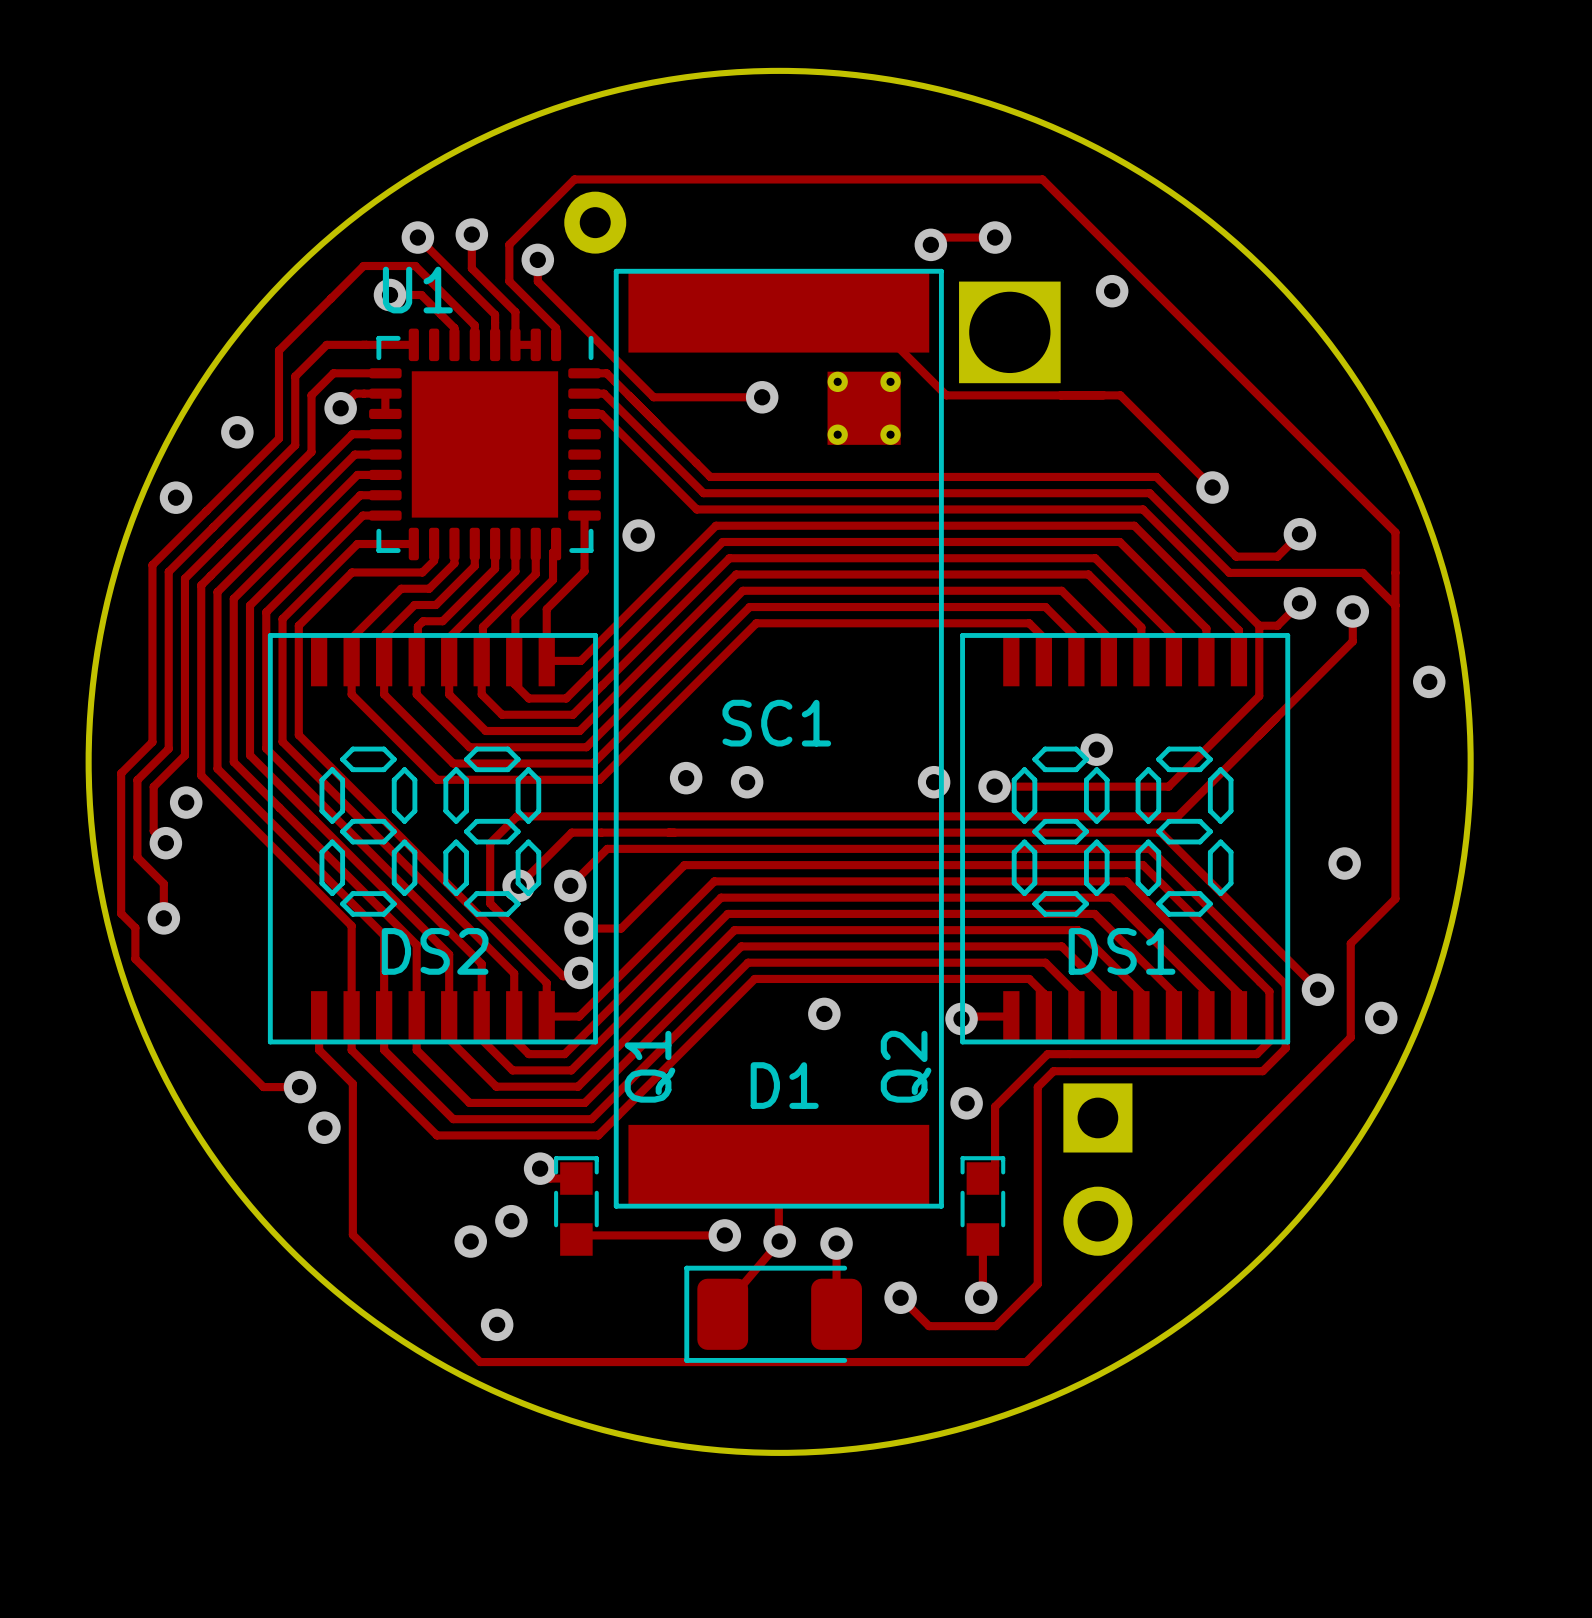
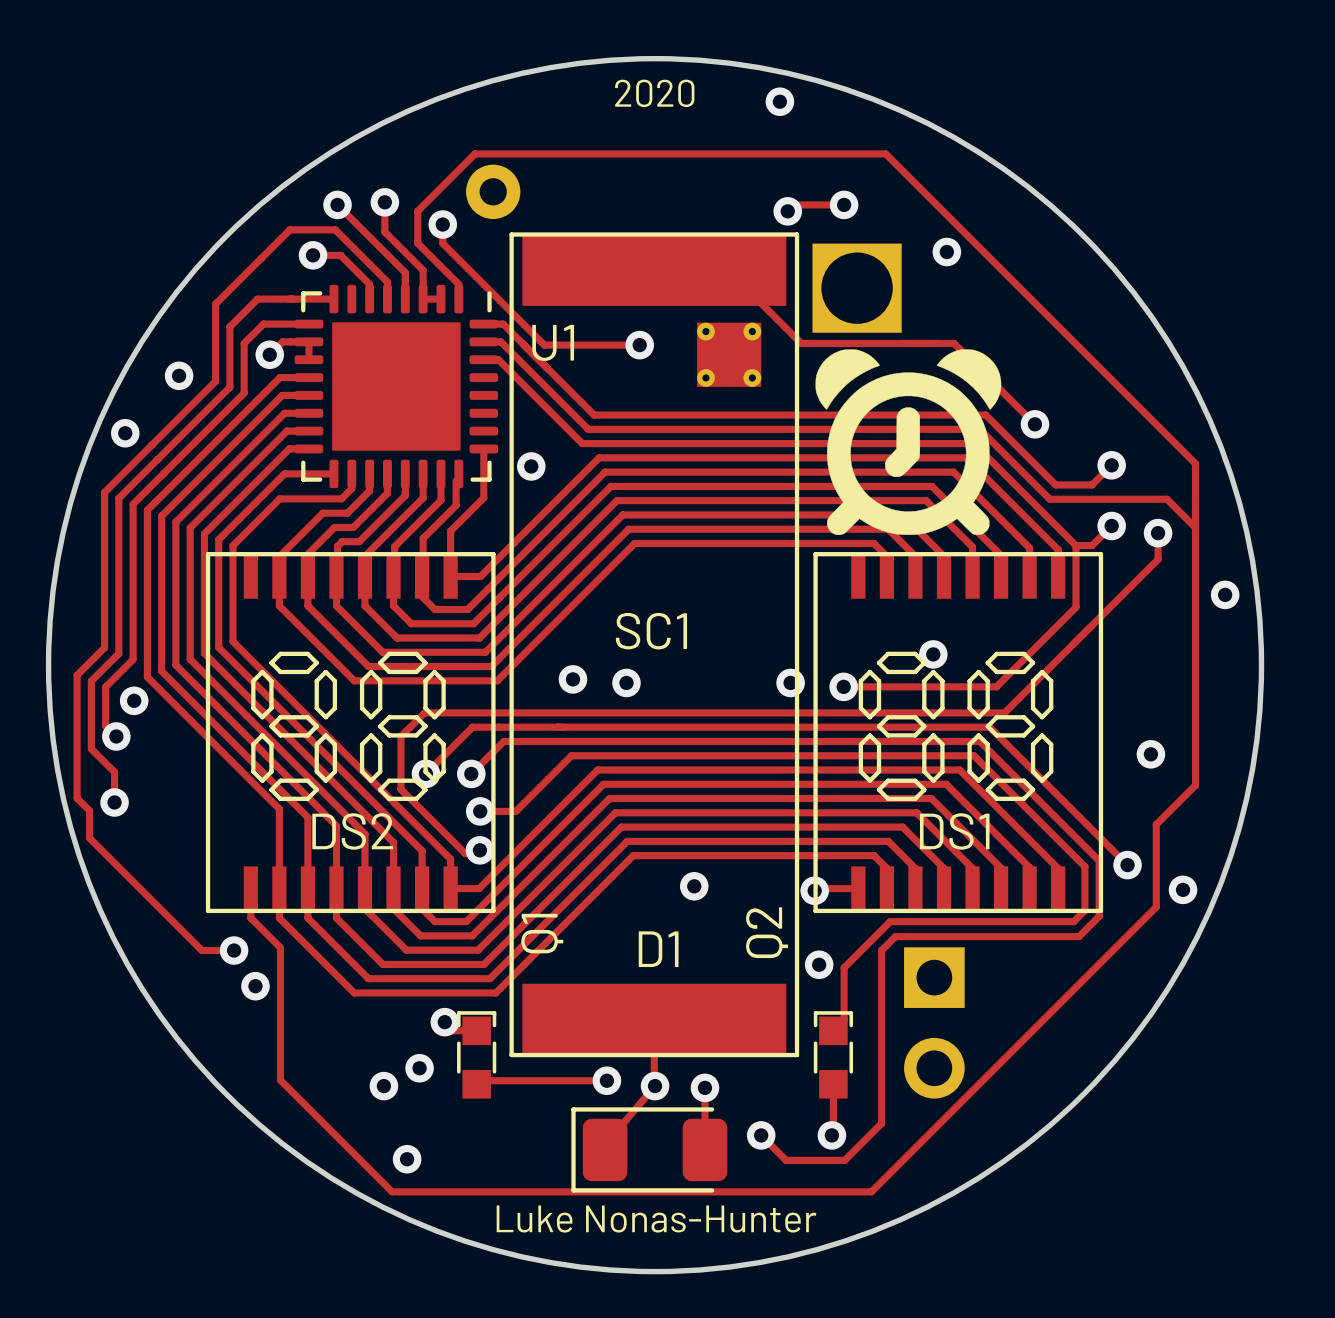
text: none -> 2020 (654, 93)
via: none -> (779, 101)
U1 name position: U1 (417, 290) -> U1 (553, 342)
drawing: none -> [815, 349, 1002, 536]
text: none -> Luke Nonas-Hunter (656, 1219)

